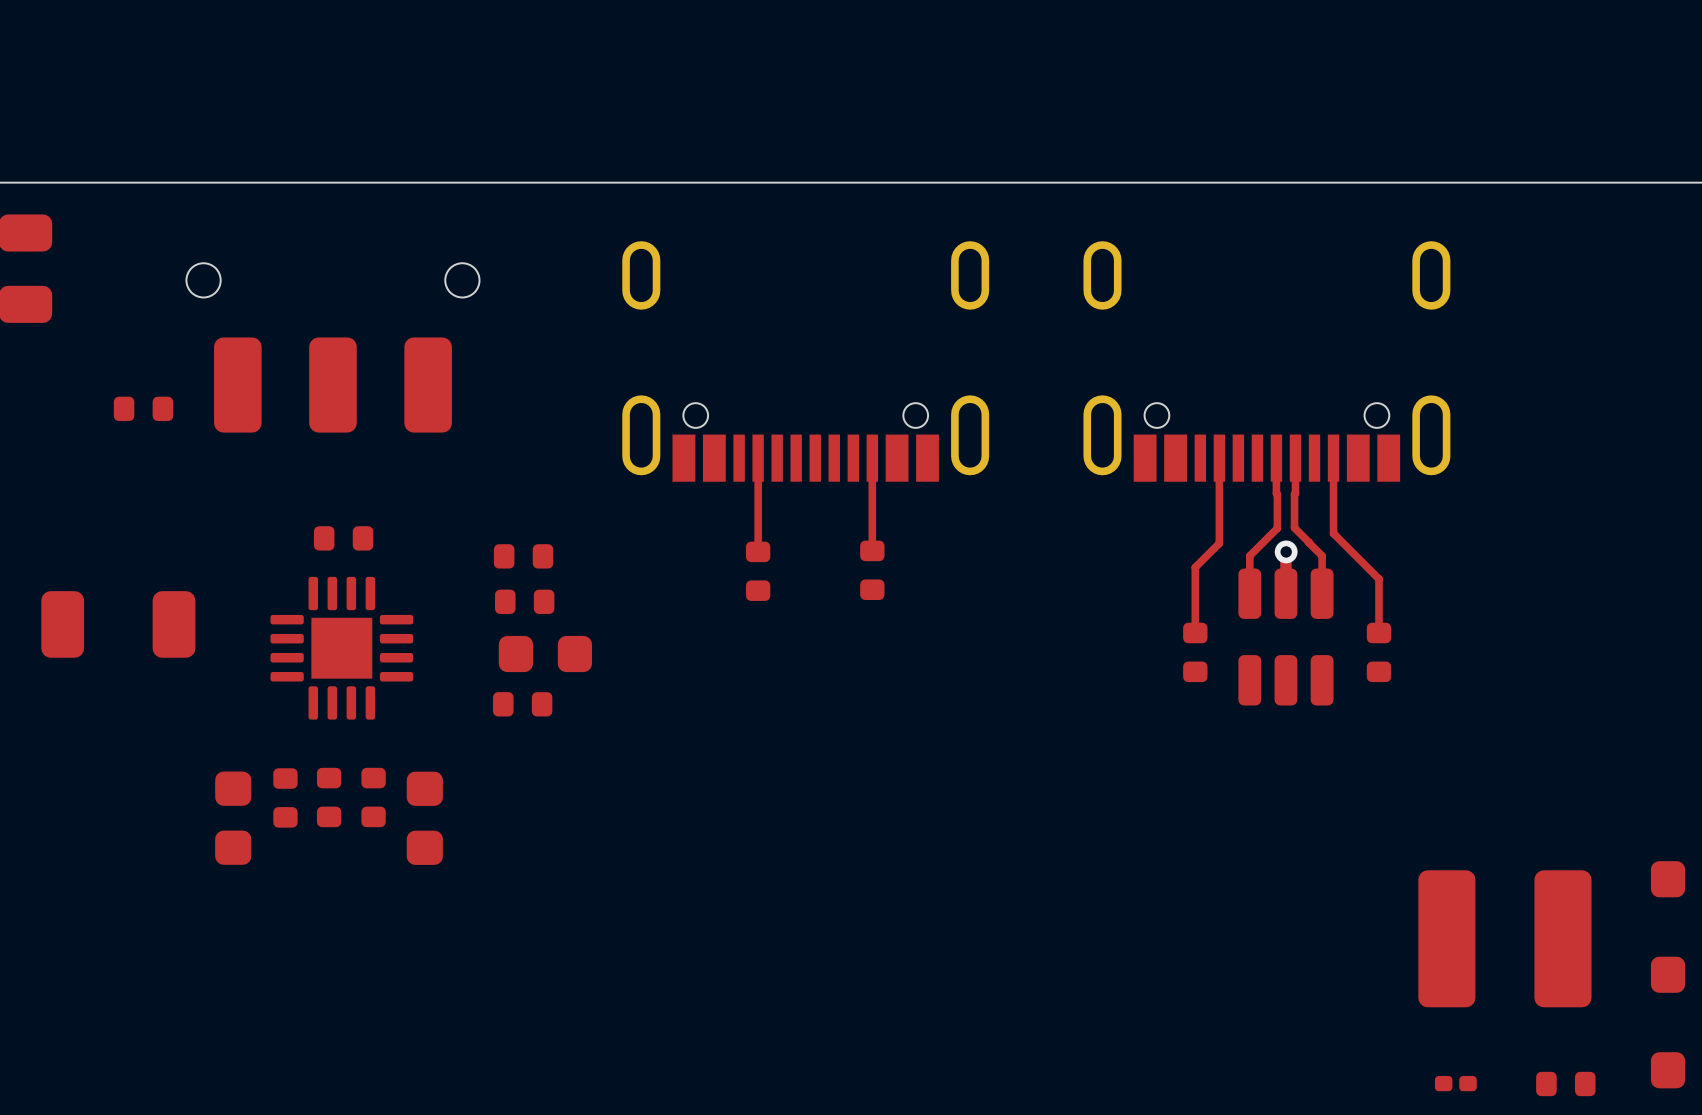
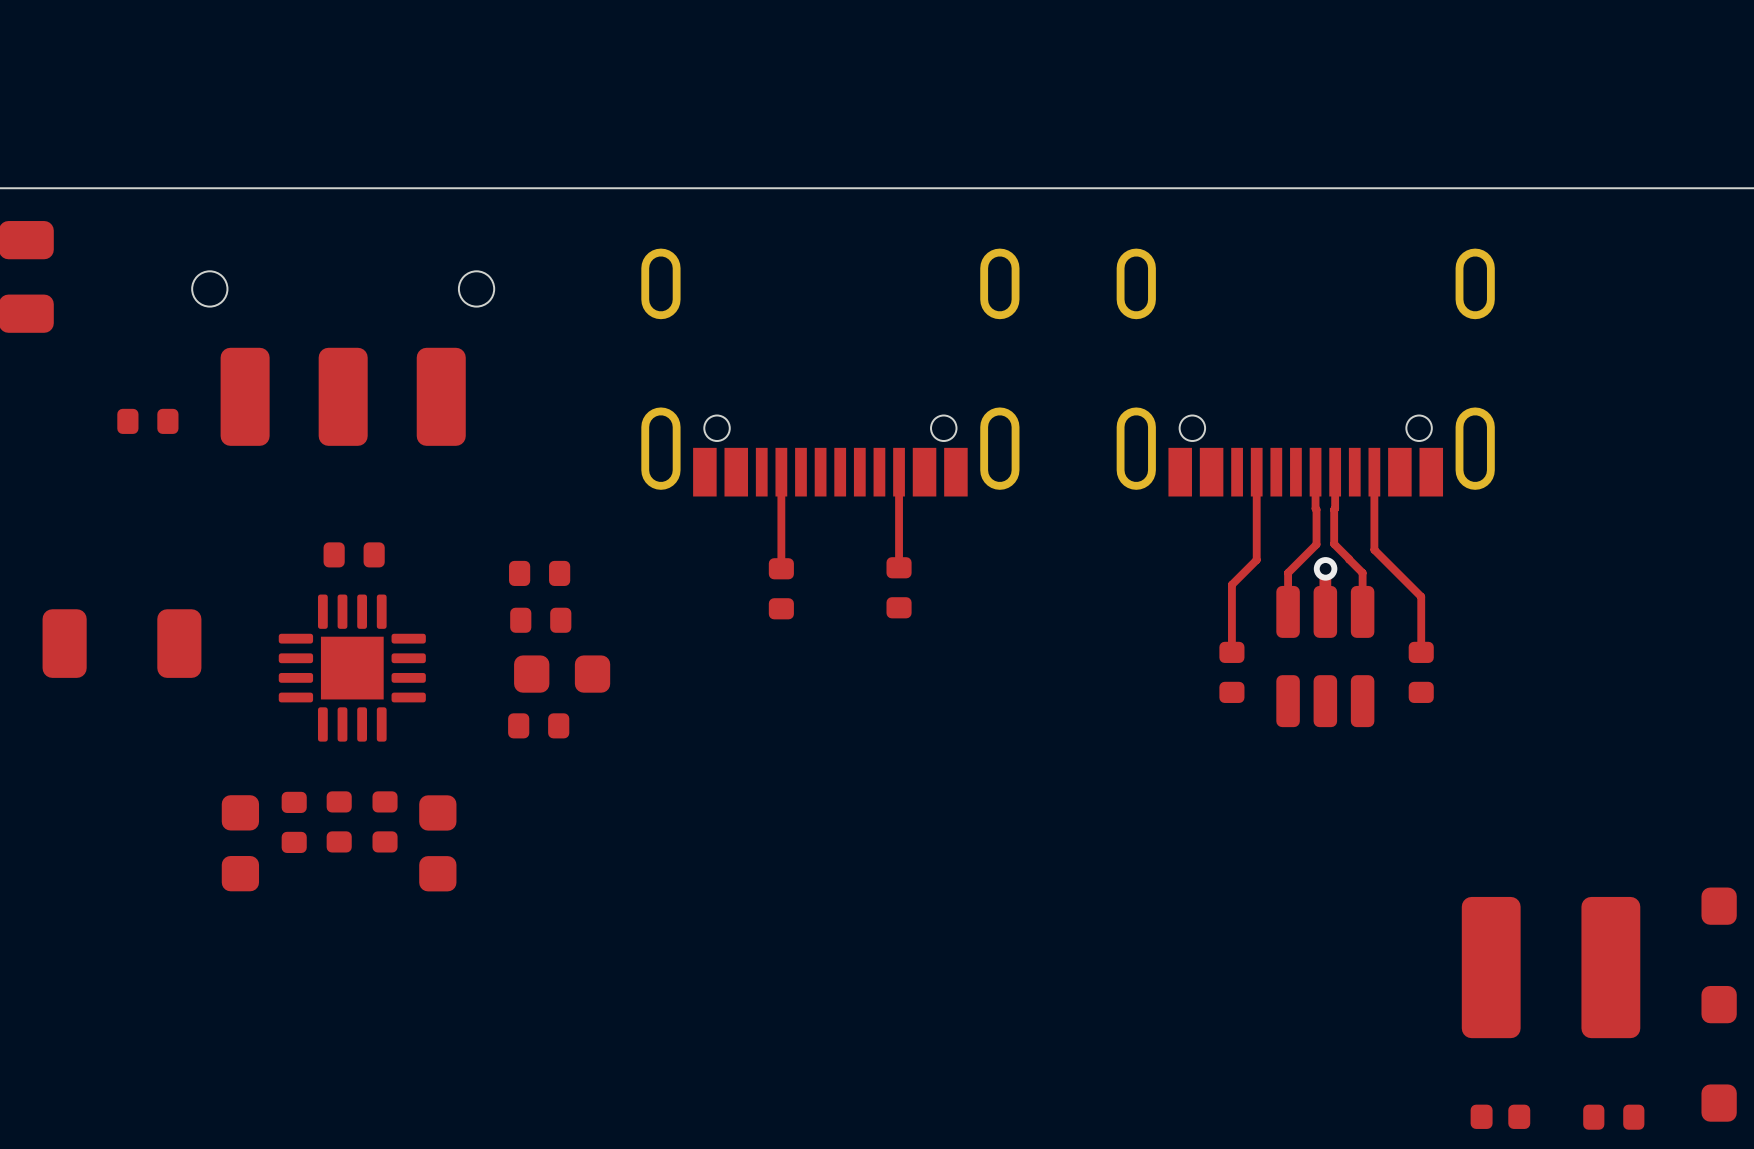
part footprint: [1434, 1075, 1477, 1092] -> [1470, 1104, 1531, 1129]

